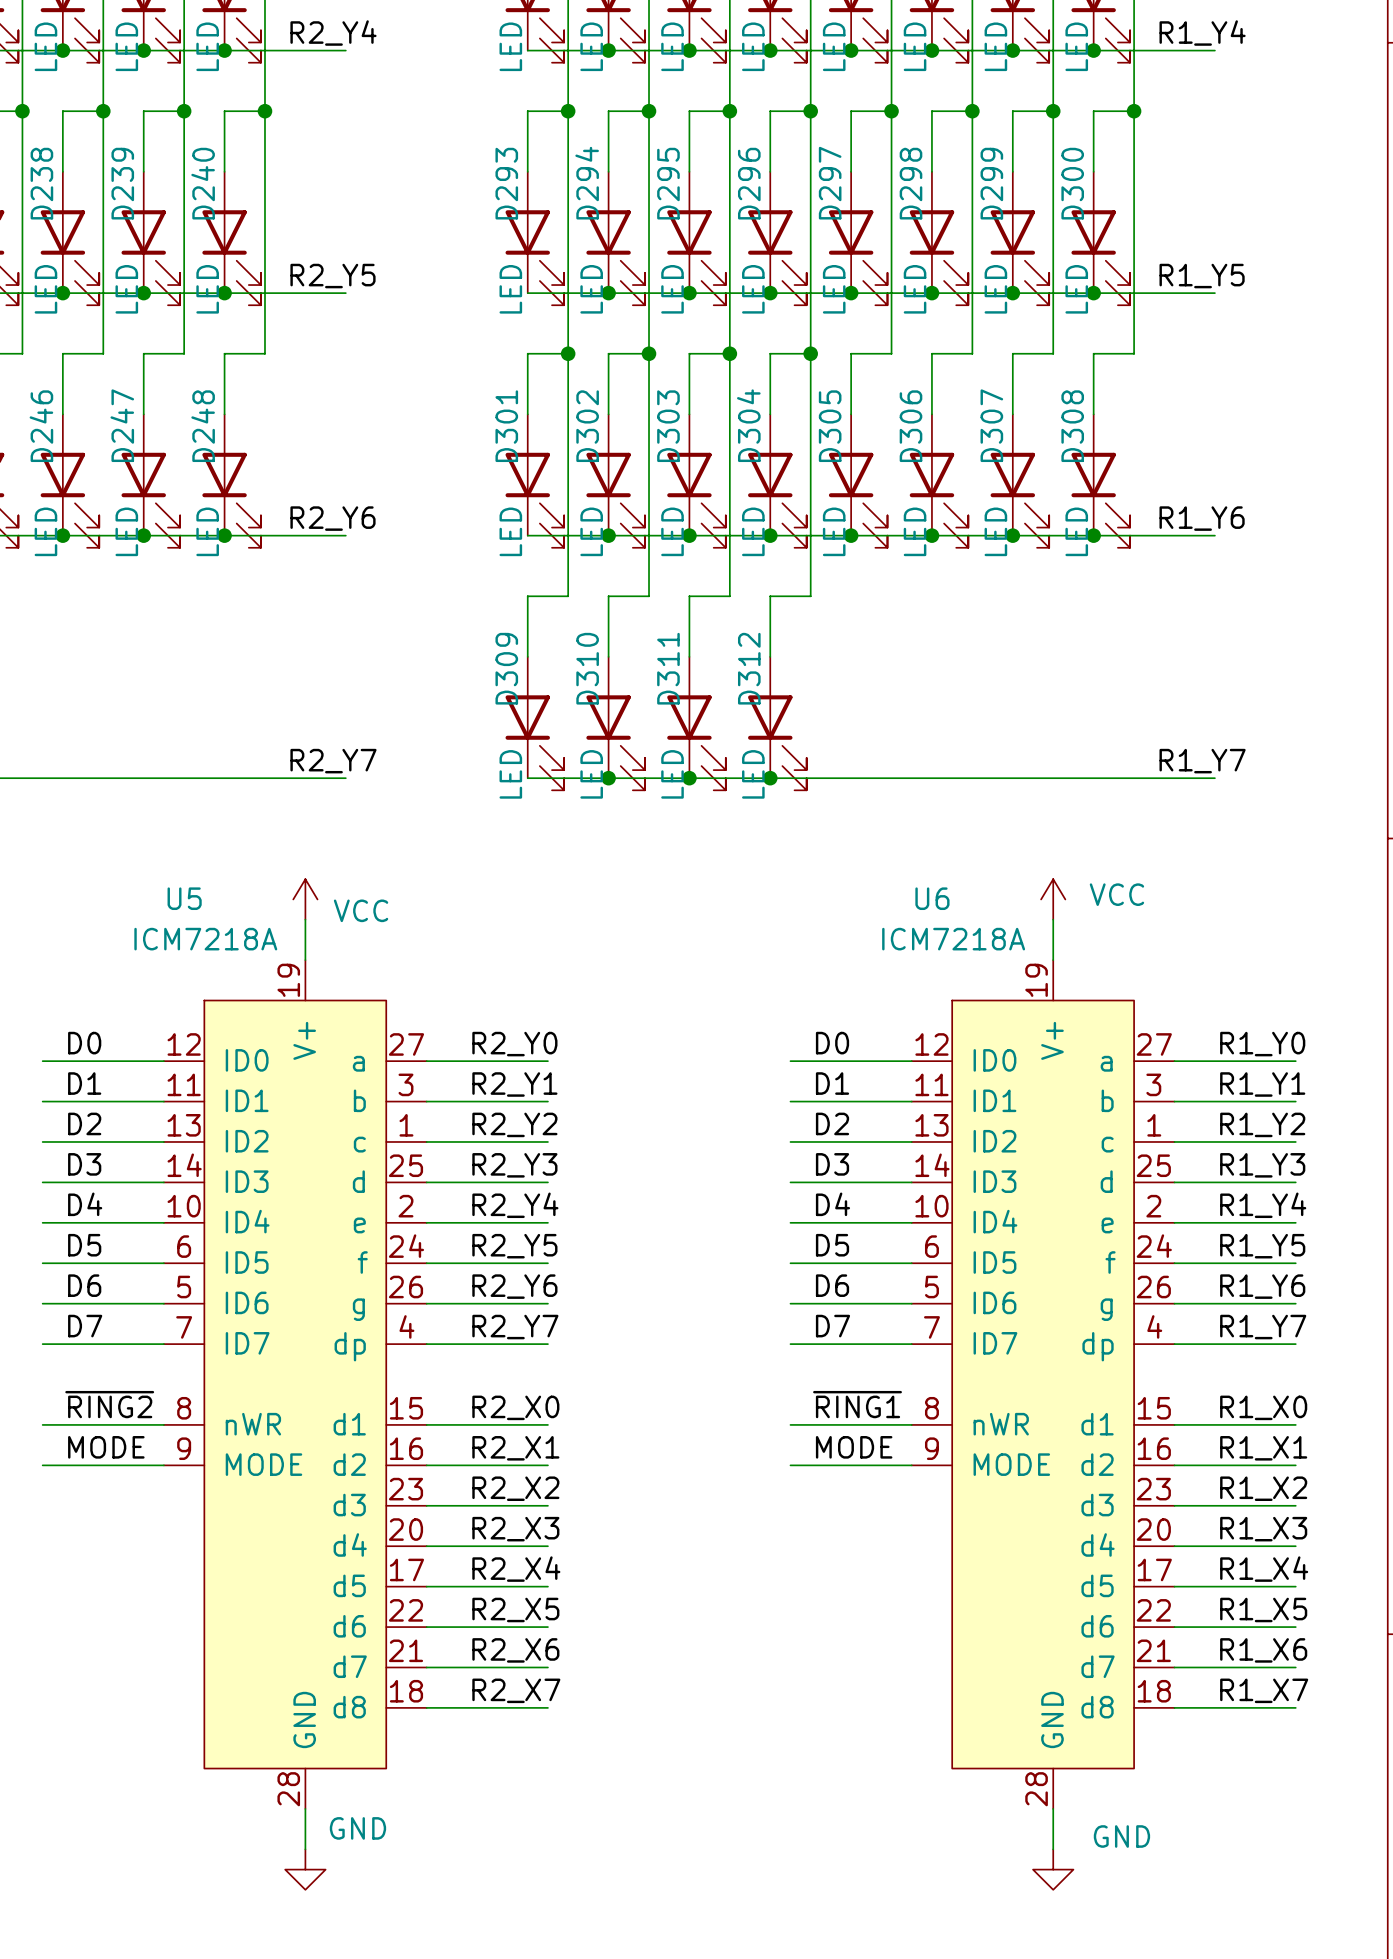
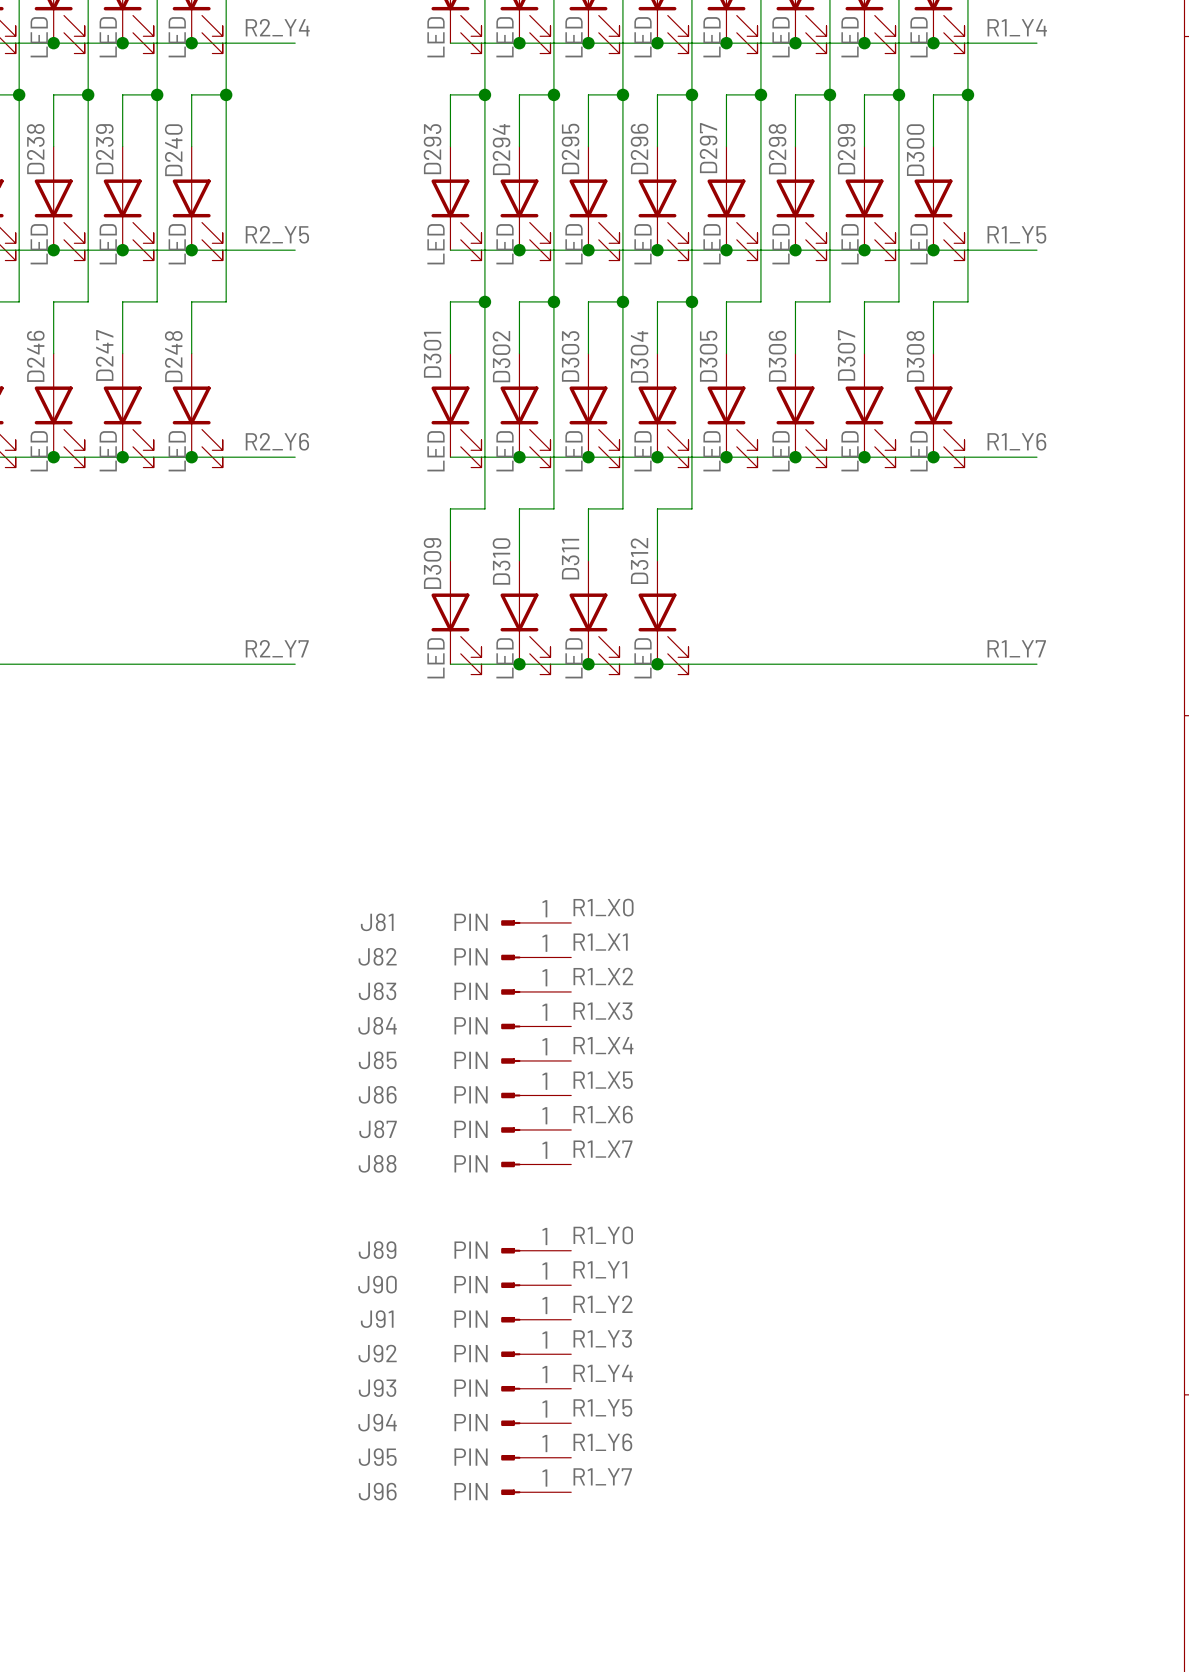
power symbol: VCC (305, 899) -> none
power symbol: VCC (1053, 899) -> none
wire: (305, 919) (305, 960) -> none
wire: (1053, 919) (1053, 960) -> none
label: D0 (84, 1043) -> none
label: D0 (832, 1043) -> none
label: R2_Y0 (514, 1044) -> none
label: R1_Y0 (1262, 1044) -> none
wire: (42, 1061) (163, 1061) -> none
wire: (426, 1061) (547, 1061) -> none
wire: (790, 1061) (911, 1061) -> none
wire: (1174, 1061) (1295, 1061) -> none
label: none -> R1_X0 (603, 907)
J81: none -> PIN (536, 922)
label: D1 (84, 1083) -> none
label: D1 (832, 1083) -> none
label: R2_Y1 (514, 1084) -> none
label: R1_Y1 (1262, 1084) -> none
wire: (42, 1101) (163, 1101) -> none
wire: (426, 1101) (547, 1101) -> none
wire: (790, 1101) (911, 1101) -> none
wire: (1174, 1101) (1295, 1101) -> none
label: none -> R1_X1 (600, 942)
J82: none -> PIN (536, 957)
label: D2 (84, 1123) -> none
label: D2 (832, 1123) -> none
label: R2_Y2 (514, 1124) -> none
label: R1_Y2 (1262, 1124) -> none
wire: (42, 1141) (163, 1141) -> none
wire: (426, 1141) (547, 1141) -> none
wire: (790, 1141) (911, 1141) -> none
wire: (1174, 1141) (1295, 1141) -> none
label: none -> R1_X2 (603, 976)
J83: none -> PIN (536, 991)
label: D3 (84, 1164) -> none
label: D3 (832, 1164) -> none
label: R2_Y3 (514, 1165) -> none
label: R1_Y3 (1262, 1165) -> none
wire: (42, 1182) (163, 1182) -> none
wire: (426, 1182) (547, 1182) -> none
wire: (790, 1182) (911, 1182) -> none
wire: (1174, 1182) (1295, 1182) -> none
label: none -> R1_X3 (602, 1011)
J84: none -> PIN (536, 1026)
label: D4 (85, 1204) -> none
label: D4 (832, 1204) -> none
label: R2_Y4 (515, 1205) -> none
label: R1_Y4 (1263, 1205) -> none
wire: (42, 1222) (163, 1222) -> none
wire: (426, 1222) (547, 1222) -> none
wire: (790, 1222) (911, 1222) -> none
wire: (1174, 1222) (1295, 1222) -> none
label: none -> R1_X4 (603, 1045)
J85: none -> PIN (536, 1060)
label: D5 (84, 1245) -> none
label: D5 (832, 1245) -> none
label: R2_Y5 (514, 1246) -> none
label: R1_Y5 (1262, 1246) -> none
wire: (42, 1263) (163, 1263) -> none
wire: (426, 1263) (547, 1263) -> none
wire: (790, 1263) (911, 1263) -> none
wire: (1174, 1263) (1295, 1263) -> none
label: none -> R1_X5 (603, 1080)
J86: none -> PIN (536, 1095)
label: D6 (84, 1285) -> none
label: D6 (832, 1285) -> none
label: R2_Y6 (514, 1286) -> none
label: R1_Y6 (1262, 1286) -> none
wire: (42, 1303) (163, 1303) -> none
wire: (426, 1303) (547, 1303) -> none
wire: (790, 1303) (911, 1303) -> none
wire: (1174, 1303) (1295, 1303) -> none
label: none -> R1_X6 (603, 1114)
J87: none -> PIN (536, 1129)
label: D7 (85, 1326) -> none
label: D7 (832, 1326) -> none
label: R2_Y7 (515, 1327) -> none
label: R1_Y7 (1263, 1327) -> none
wire: (42, 1344) (163, 1344) -> none
wire: (426, 1344) (547, 1344) -> none
wire: (790, 1344) (911, 1344) -> none
wire: (1174, 1344) (1295, 1344) -> none
label: none -> R1_X7 (602, 1149)
J88: none -> PIN (536, 1164)
U5: ICM7218A (295, 1384) -> none
U6: ICM7218A (1043, 1384) -> none
label: ~{RING2} (109, 1404) -> none
label: ~{RING1} (857, 1404) -> none
label: R2_X0 (515, 1407) -> none
label: R1_X0 (1263, 1407) -> none
wire: (42, 1424) (163, 1424) -> none
wire: (426, 1424) (547, 1424) -> none
wire: (790, 1424) (911, 1424) -> none
wire: (1174, 1424) (1295, 1424) -> none
label: MODE (106, 1447) -> none
label: MODE (854, 1447) -> none
label: R2_X1 (515, 1448) -> none
label: none -> R1_Y0 (603, 1235)
label: R1_X1 (1263, 1448) -> none
wire: (42, 1465) (163, 1465) -> none
wire: (426, 1465) (547, 1465) -> none
J89: none -> PIN (536, 1250)
wire: (790, 1465) (911, 1465) -> none
wire: (1174, 1465) (1295, 1465) -> none
label: R2_X2 (515, 1488) -> none
label: none -> R1_Y1 (600, 1269)
label: R1_X2 (1263, 1488) -> none
wire: (426, 1505) (547, 1505) -> none
J90: none -> PIN (536, 1285)
wire: (1174, 1505) (1295, 1505) -> none
label: R2_X3 (515, 1529) -> none
label: none -> R1_Y2 (603, 1304)
label: R1_X3 (1263, 1529) -> none
wire: (426, 1546) (547, 1546) -> none
J91: none -> PIN (536, 1319)
wire: (1174, 1546) (1295, 1546) -> none
label: R2_X4 (516, 1569) -> none
label: none -> R1_Y3 (602, 1338)
label: R1_X4 (1264, 1569) -> none
wire: (426, 1586) (547, 1586) -> none
J92: none -> PIN (536, 1354)
wire: (1174, 1586) (1295, 1586) -> none
label: R2_X5 (515, 1609) -> none
label: none -> R1_Y4 (603, 1373)
label: R1_X5 (1263, 1609) -> none
wire: (426, 1627) (547, 1627) -> none
J93: none -> PIN (536, 1388)
wire: (1174, 1627) (1295, 1627) -> none
label: R2_X6 (515, 1650) -> none
label: none -> R1_Y5 (602, 1407)
label: R1_X6 (1263, 1650) -> none
wire: (426, 1667) (547, 1667) -> none
J94: none -> PIN (536, 1423)
wire: (1174, 1667) (1295, 1667) -> none
label: R2_X7 (516, 1690) -> none
label: none -> R1_Y6 (602, 1442)
label: R1_X7 (1264, 1690) -> none
wire: (426, 1707) (547, 1707) -> none
J95: none -> PIN (536, 1457)
wire: (1174, 1707) (1295, 1707) -> none
label: none -> R1_Y7 (602, 1476)
J96: none -> PIN (536, 1492)
wire: (305, 1808) (305, 1849) -> none
wire: (1053, 1808) (1053, 1849) -> none
power symbol: GND (305, 1869) -> none
power symbol: GND (1053, 1869) -> none

